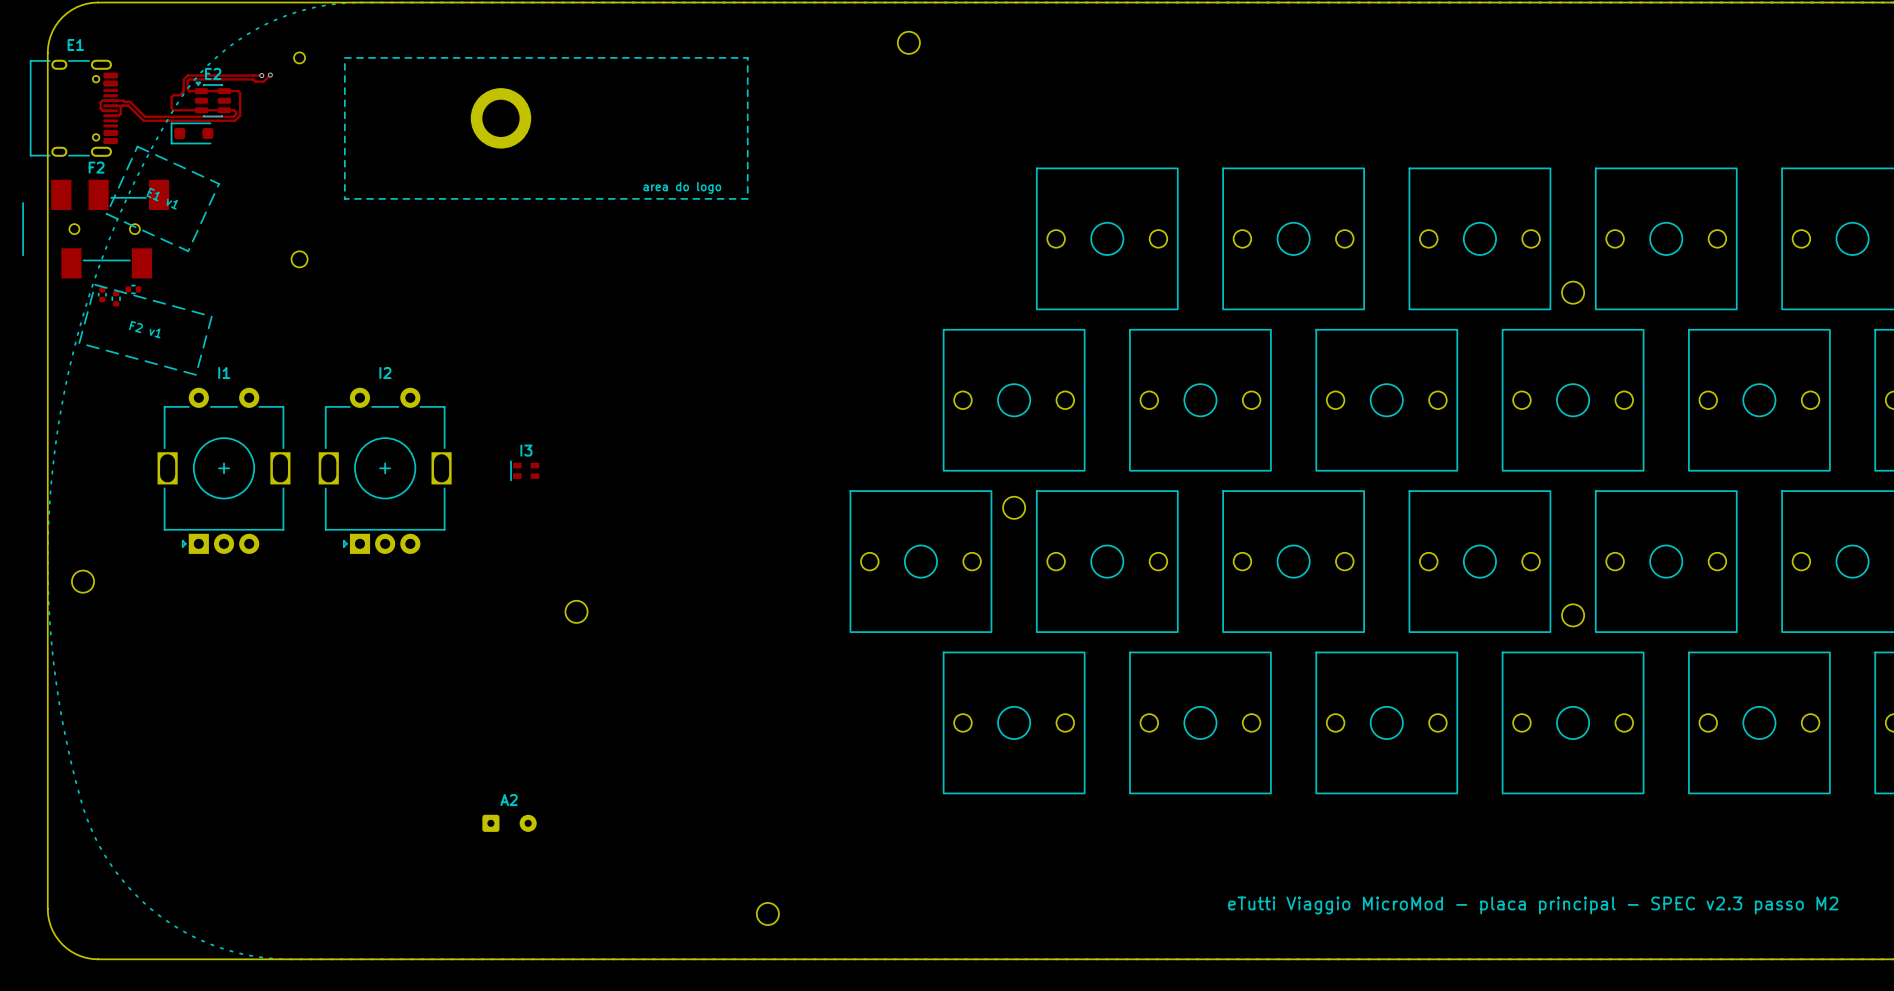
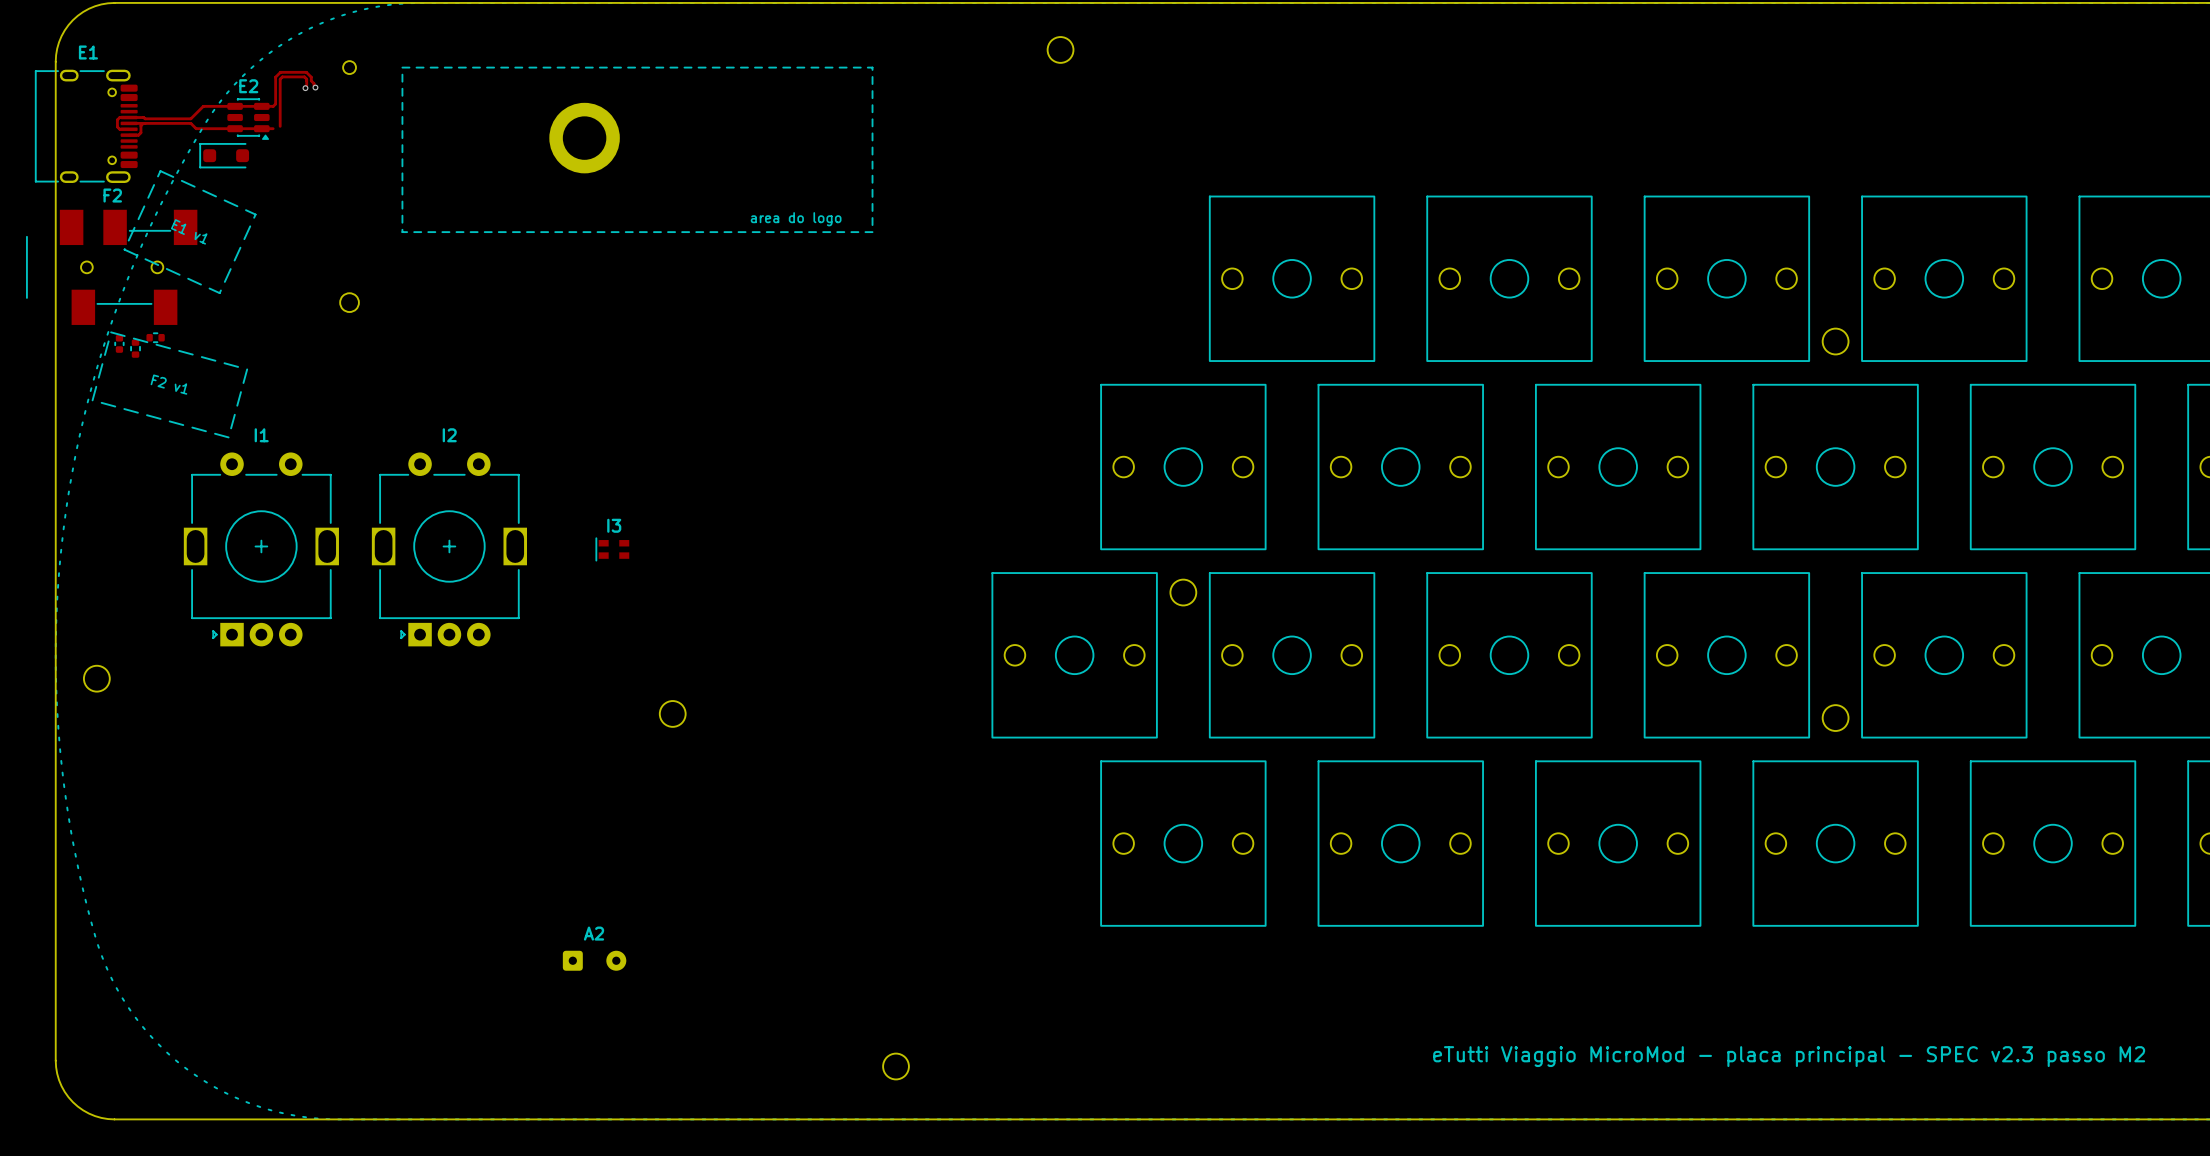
track: none -> (313, 85) (311, 77) (306, 72) (280, 72) (275, 77) (275, 104) (273, 106)
track: (261, 75) (187, 75) (183, 79) (183, 91) (179, 95) (171, 97) (171, 108) (173, 110) -> none
track: (270, 75) (263, 81) (255, 81) (253, 79) (189, 79) (187, 89) (189, 91) -> none
track: (234, 91) (240, 93) -> (306, 85) (306, 79) (304, 76) (282, 76) (280, 79) (280, 108)
part rotation: 0° (212, 99) -> 180° (248, 119)
track: (130, 101) (145, 116) (233, 116) (236, 114) (234, 110) -> (151, 118) (190, 118) (203, 106) (221, 106)
track: (128, 105) (143, 120) (235, 120) (240, 115) (240, 108) -> (149, 123) (190, 123) (196, 128) (202, 128)

